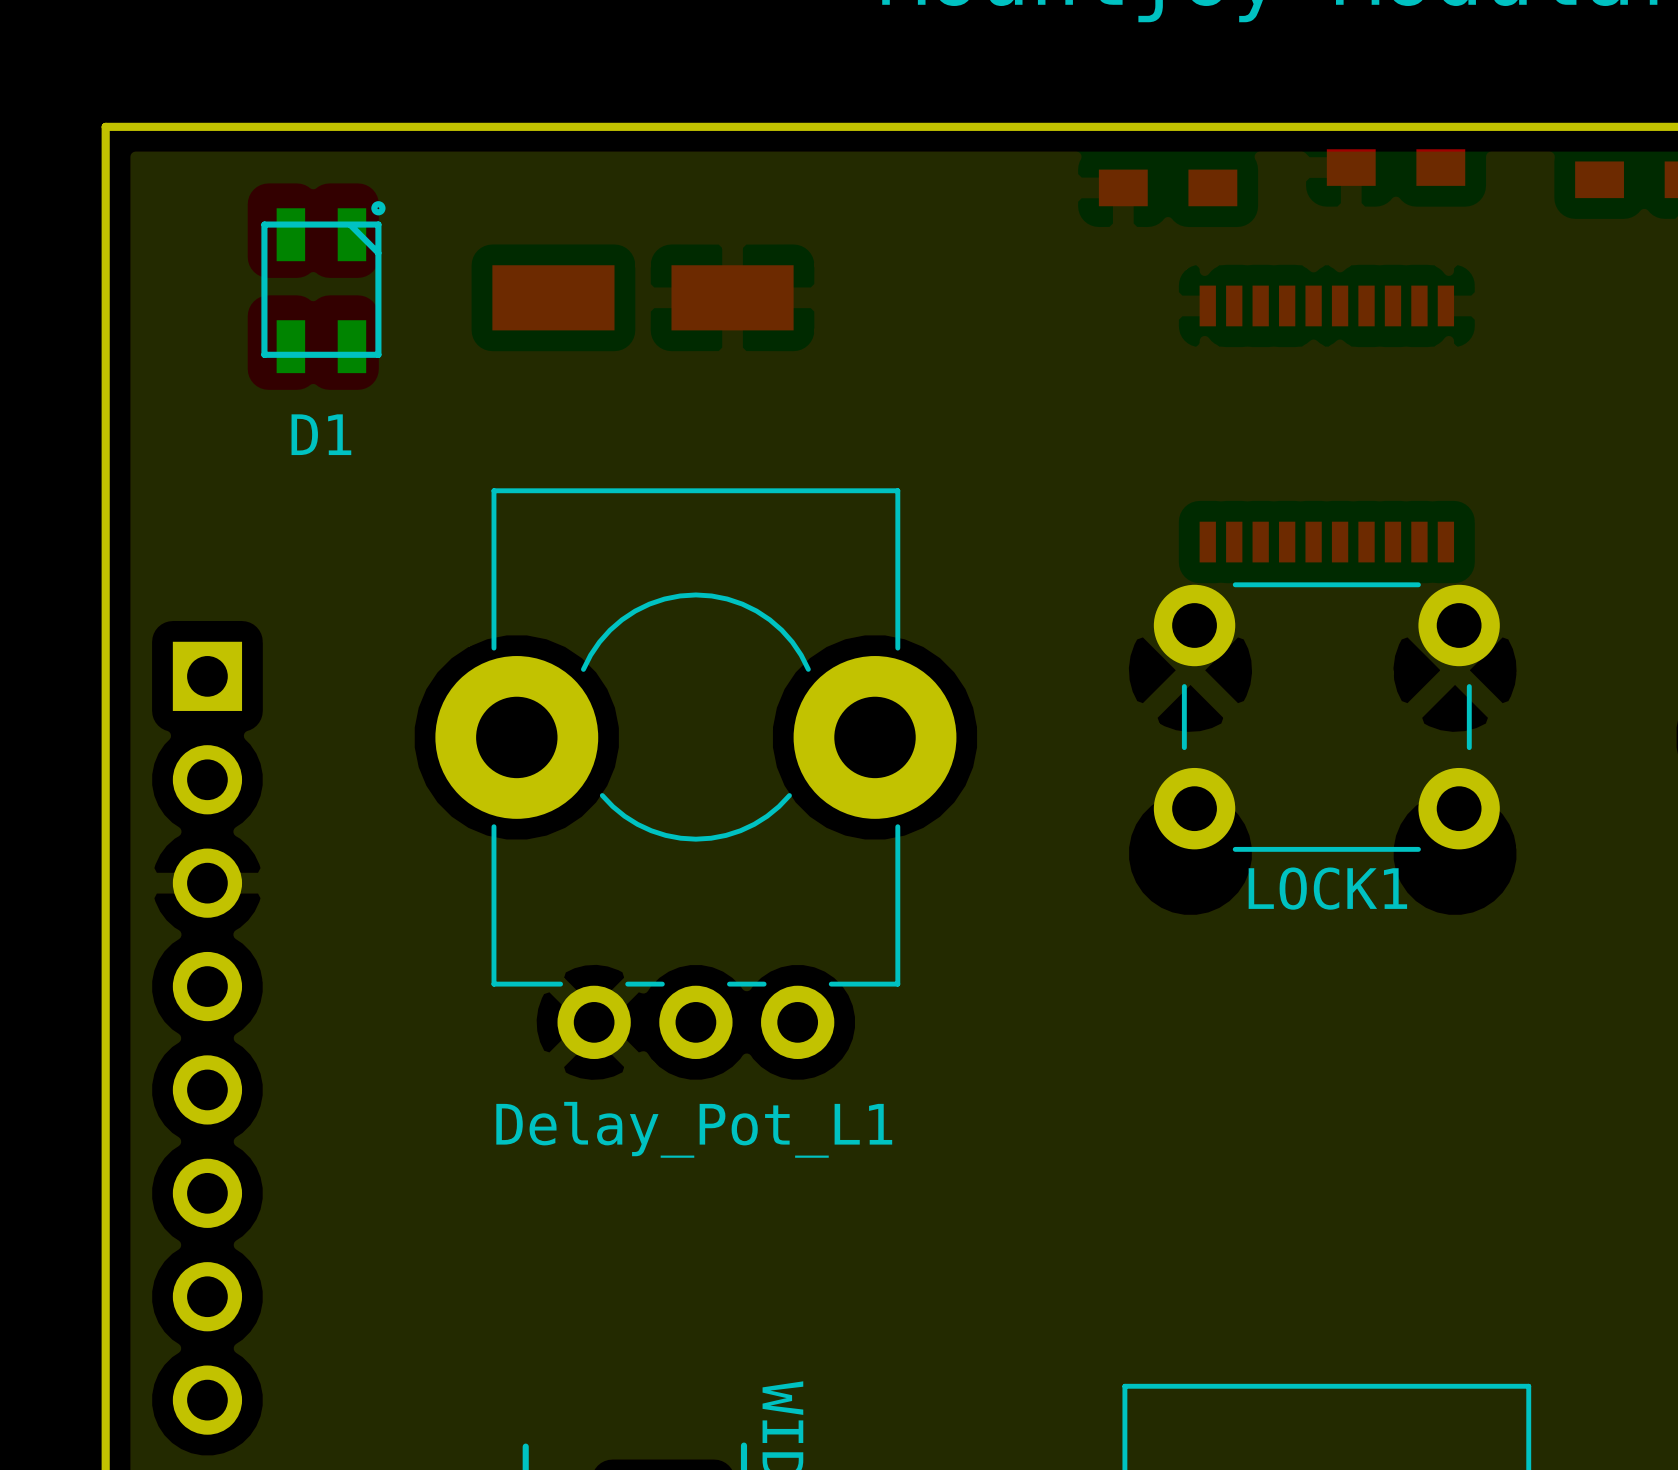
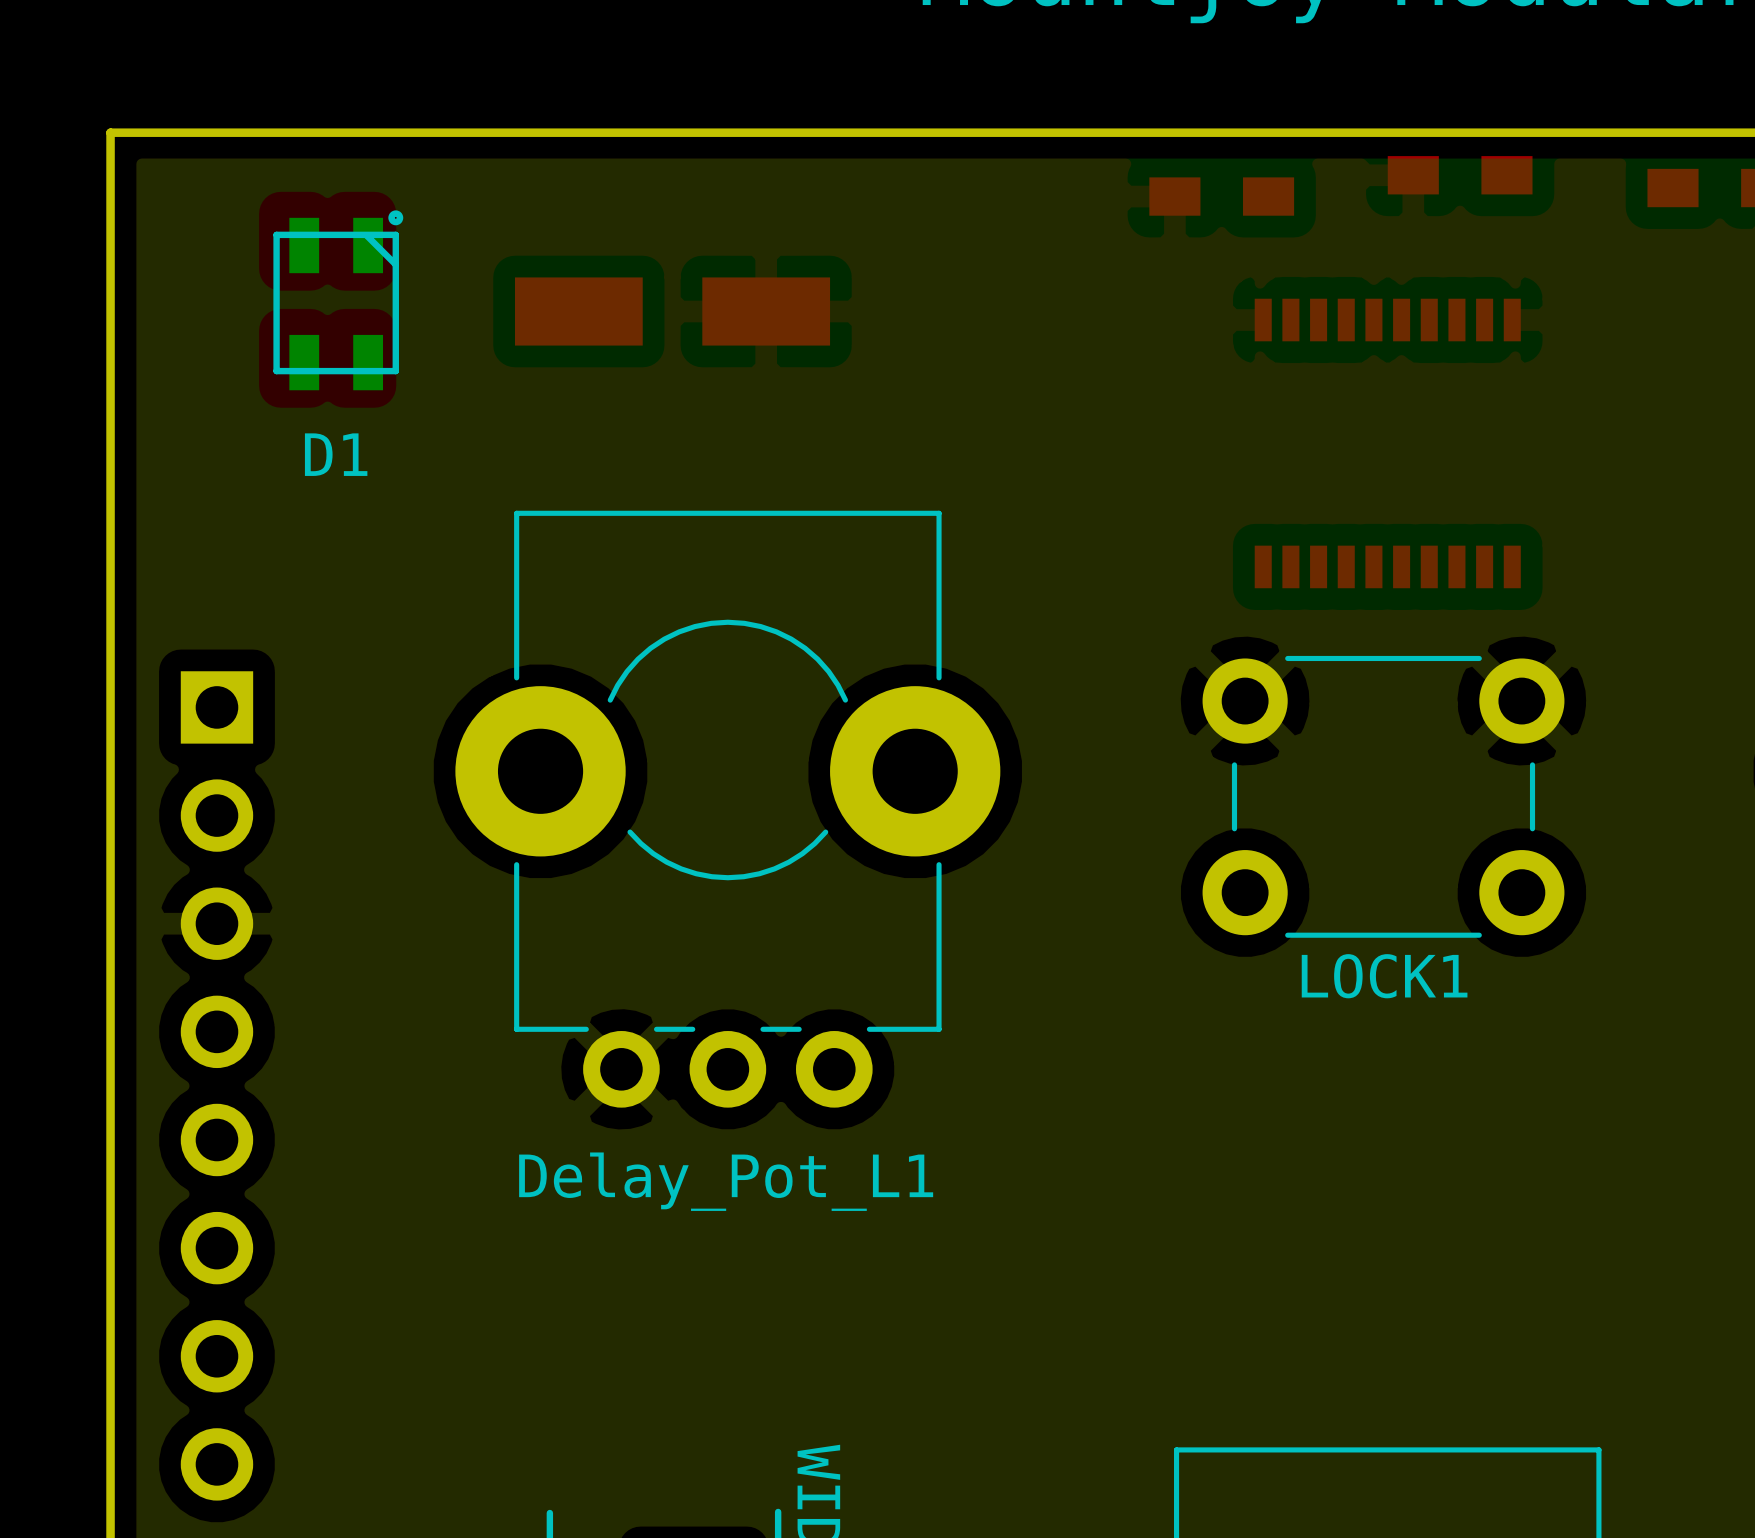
LOCK1 position: (1326, 717) -> (1383, 796)

